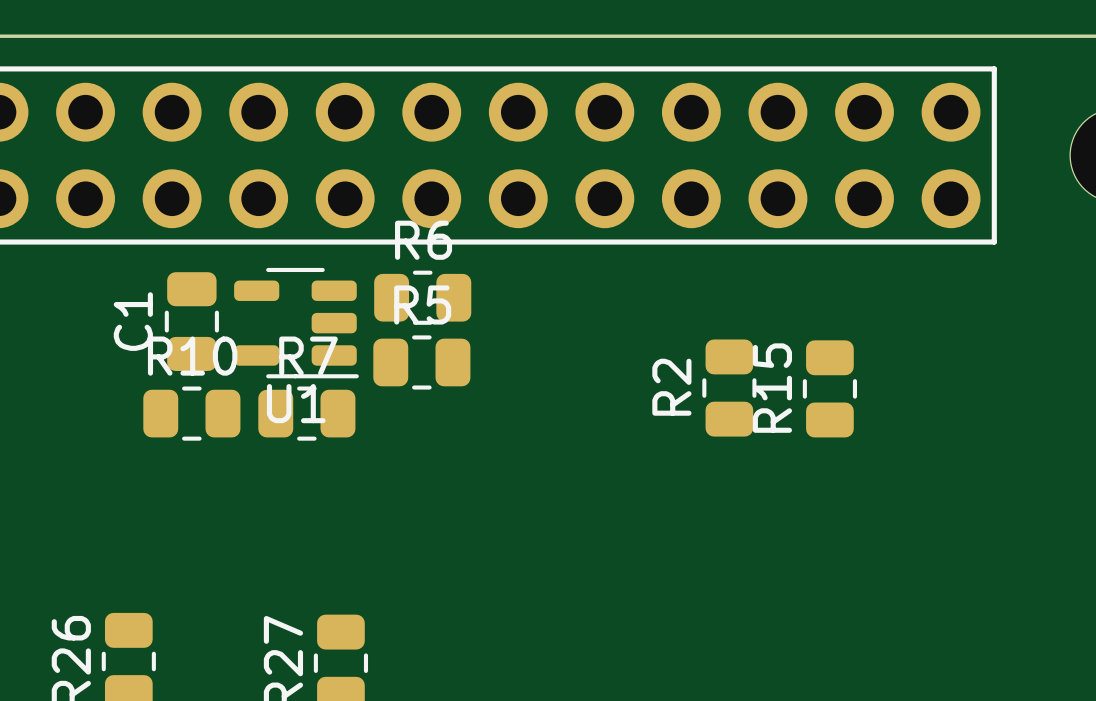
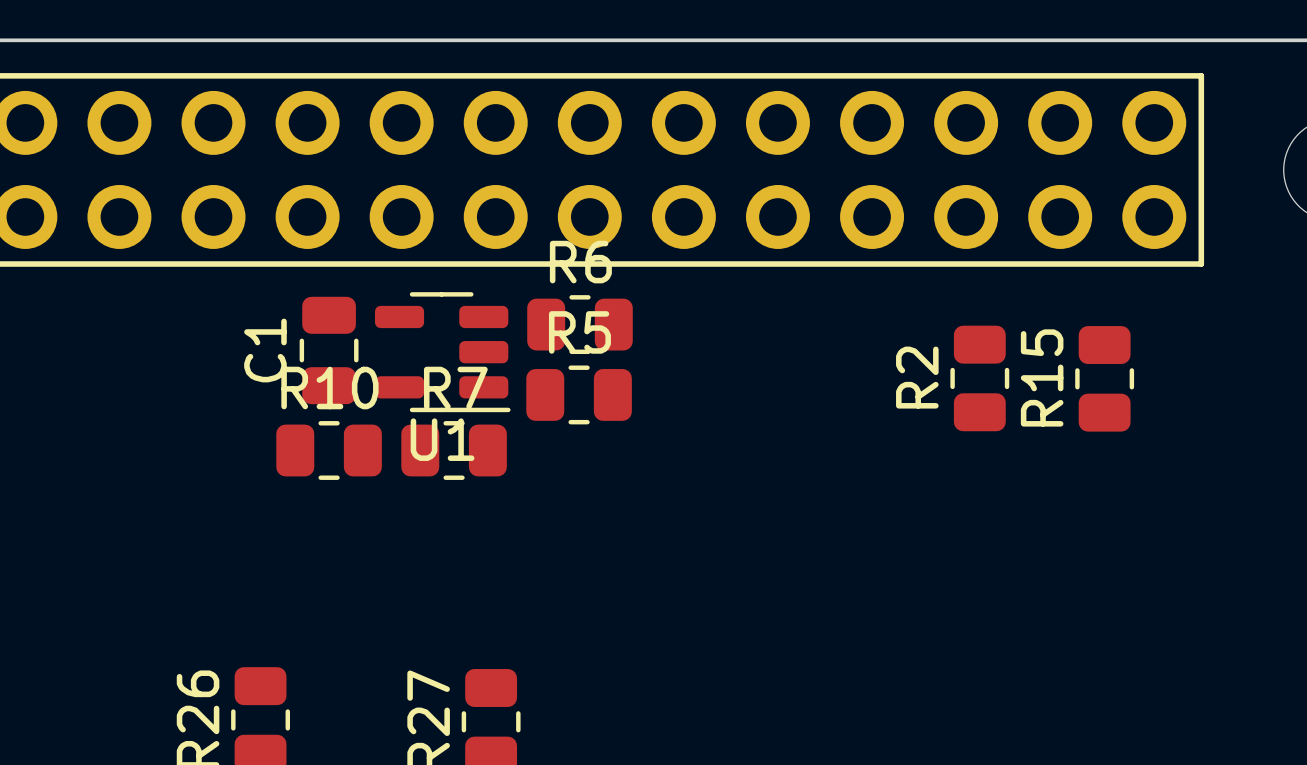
R2 position: (729, 388) -> (979, 378)
R15 position: (829, 388) -> (1104, 378)

